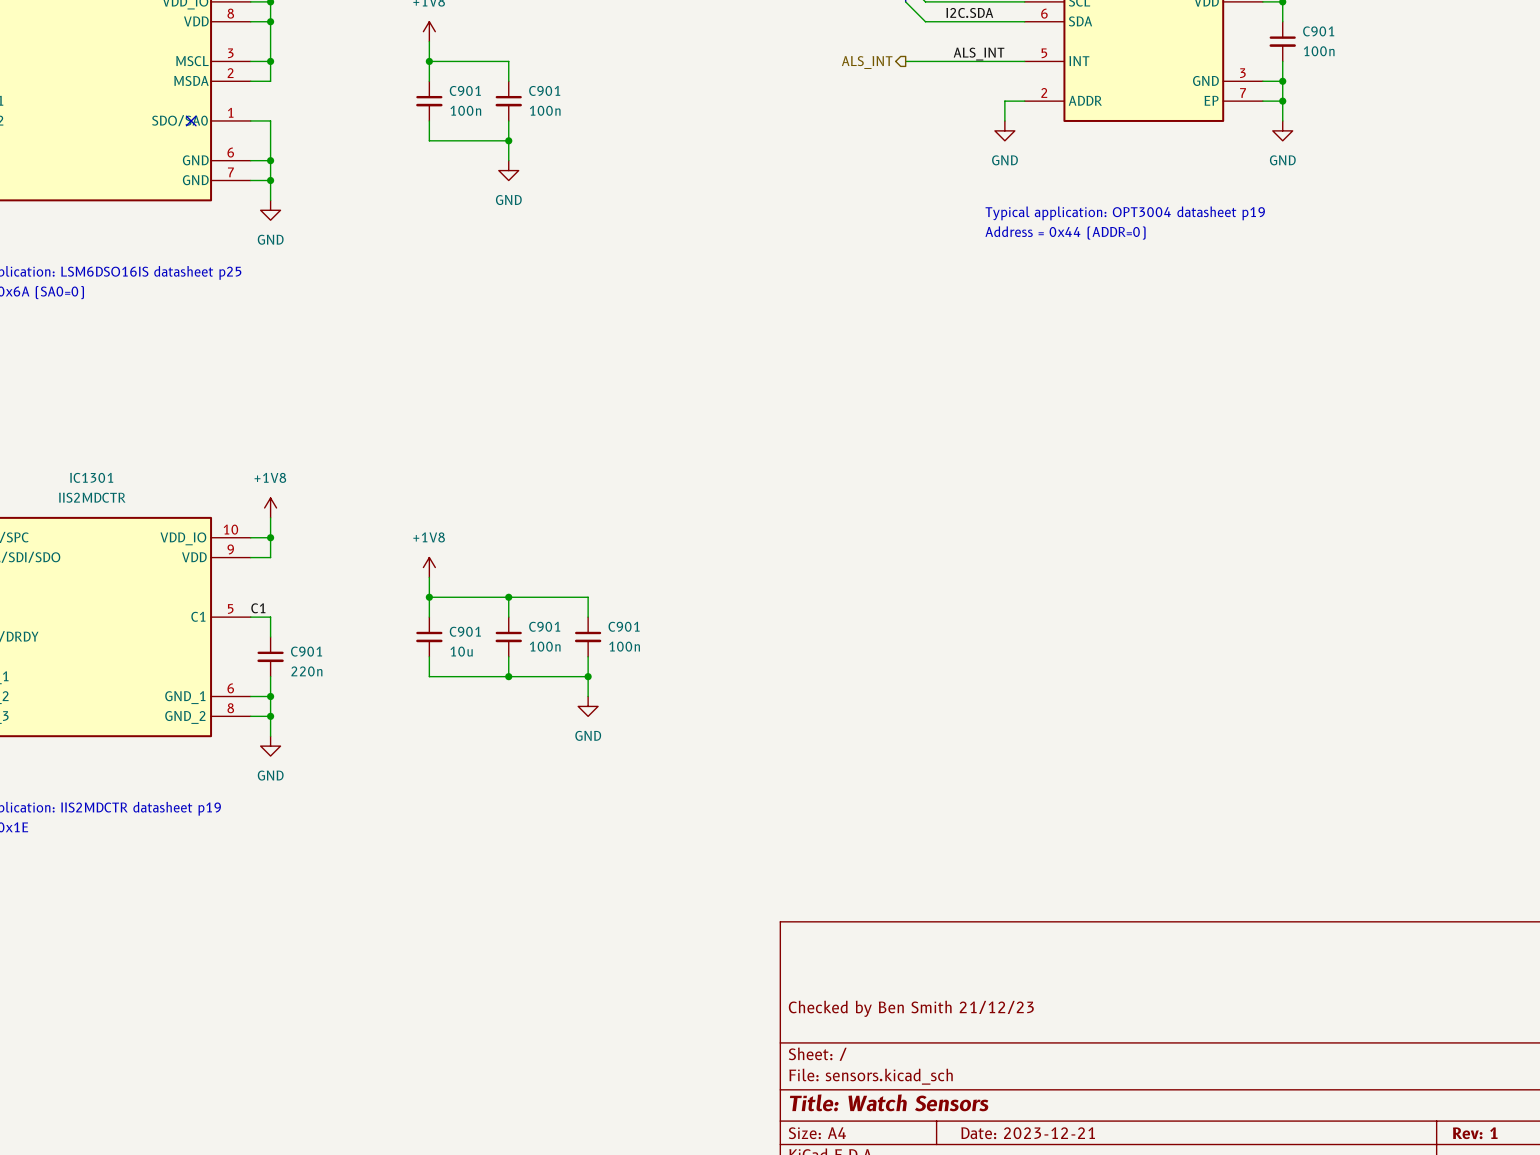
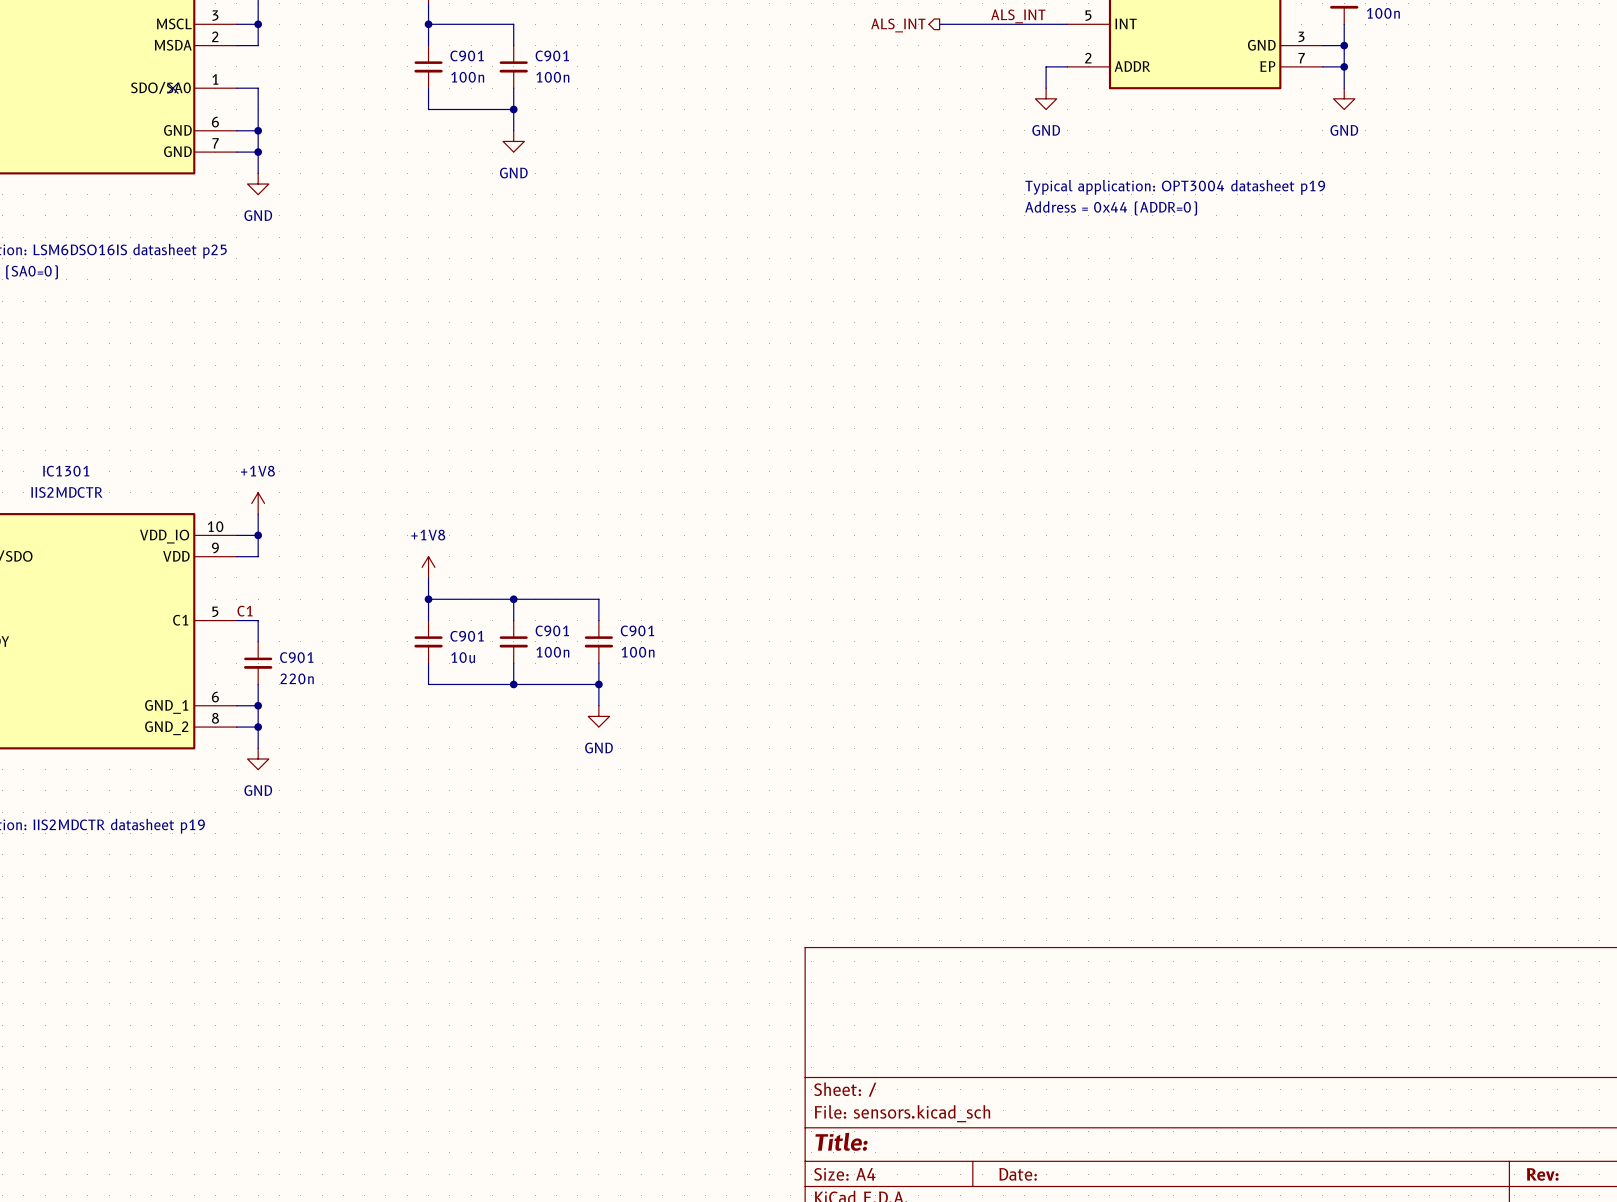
title block: Checked by Ben Smith 21/12/23 (911, 1008) -> none
title block: Title: Watch Sensors (889, 1102) -> Title: (841, 1141)
title block: Date: 2023-12-21 (1028, 1133) -> Date: (1018, 1174)
title block: Rev: 1 (1475, 1133) -> Rev: (1542, 1174)

